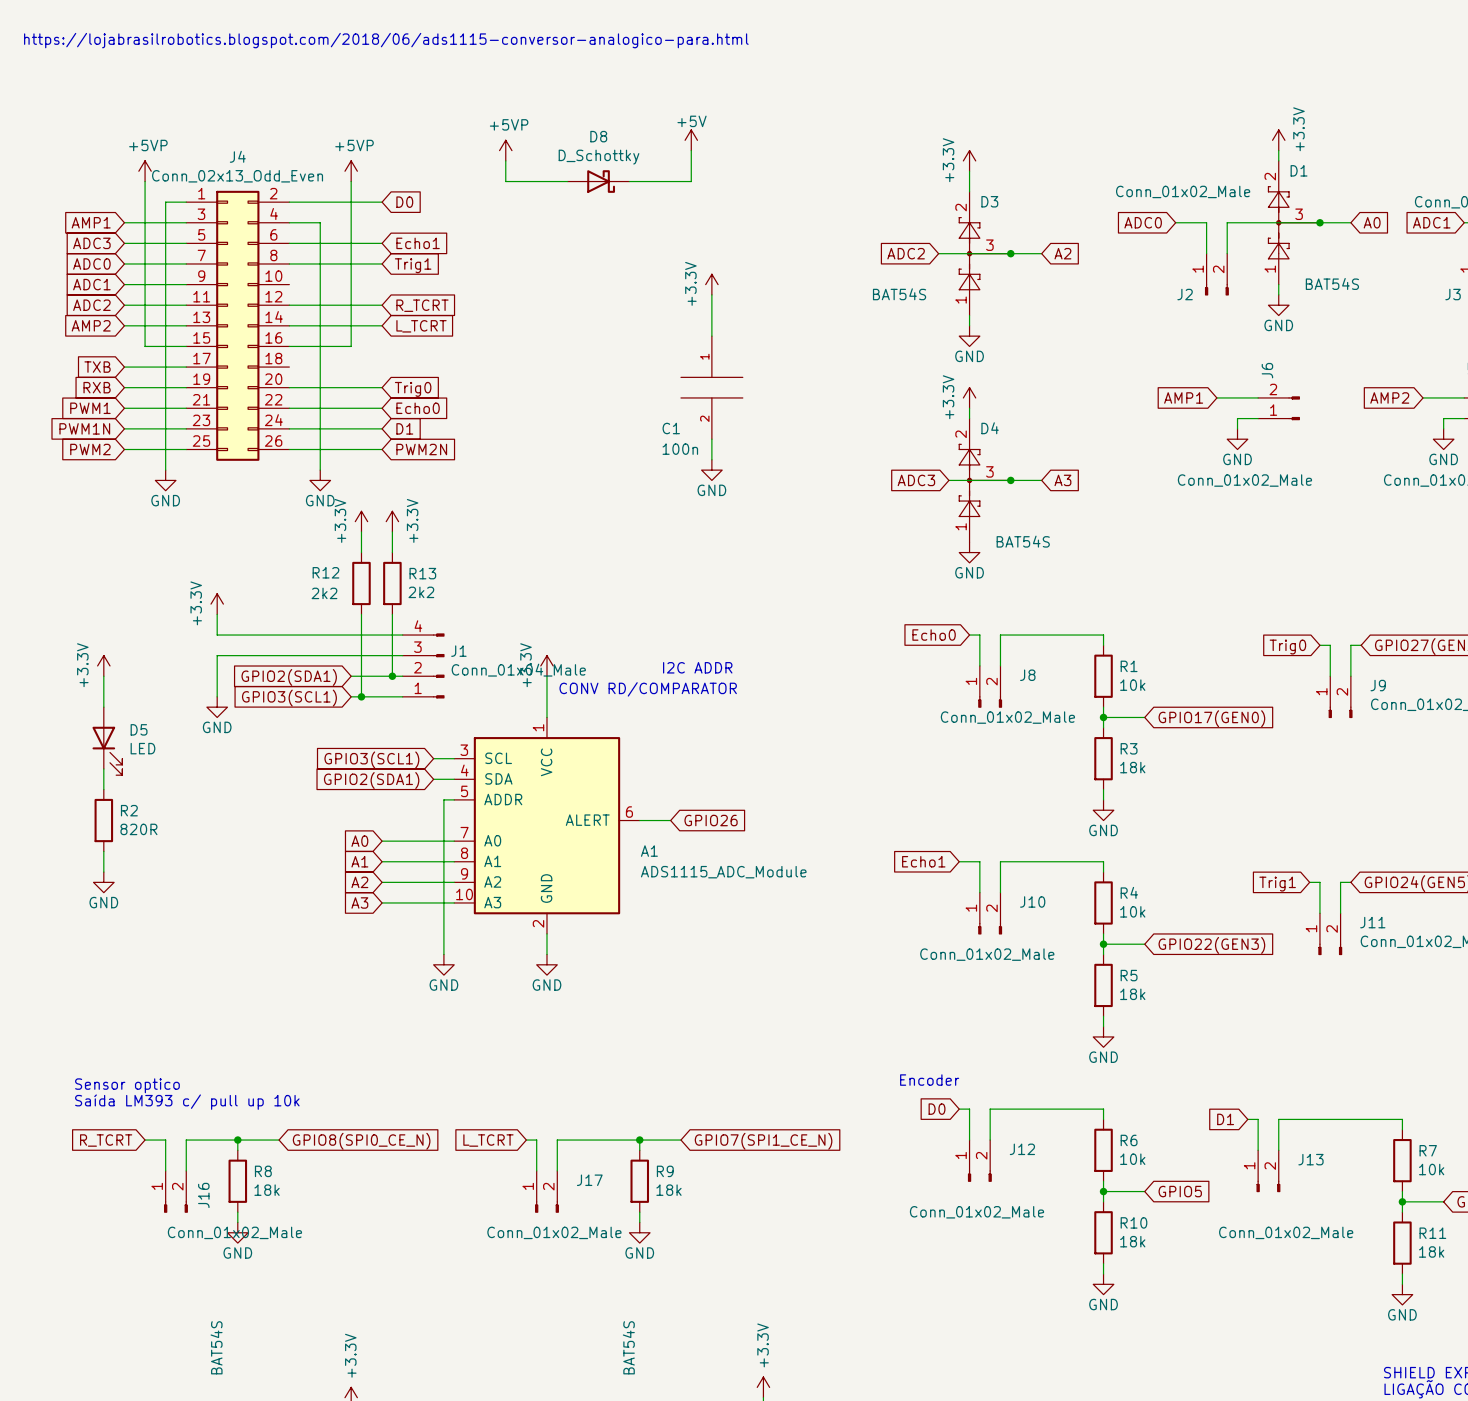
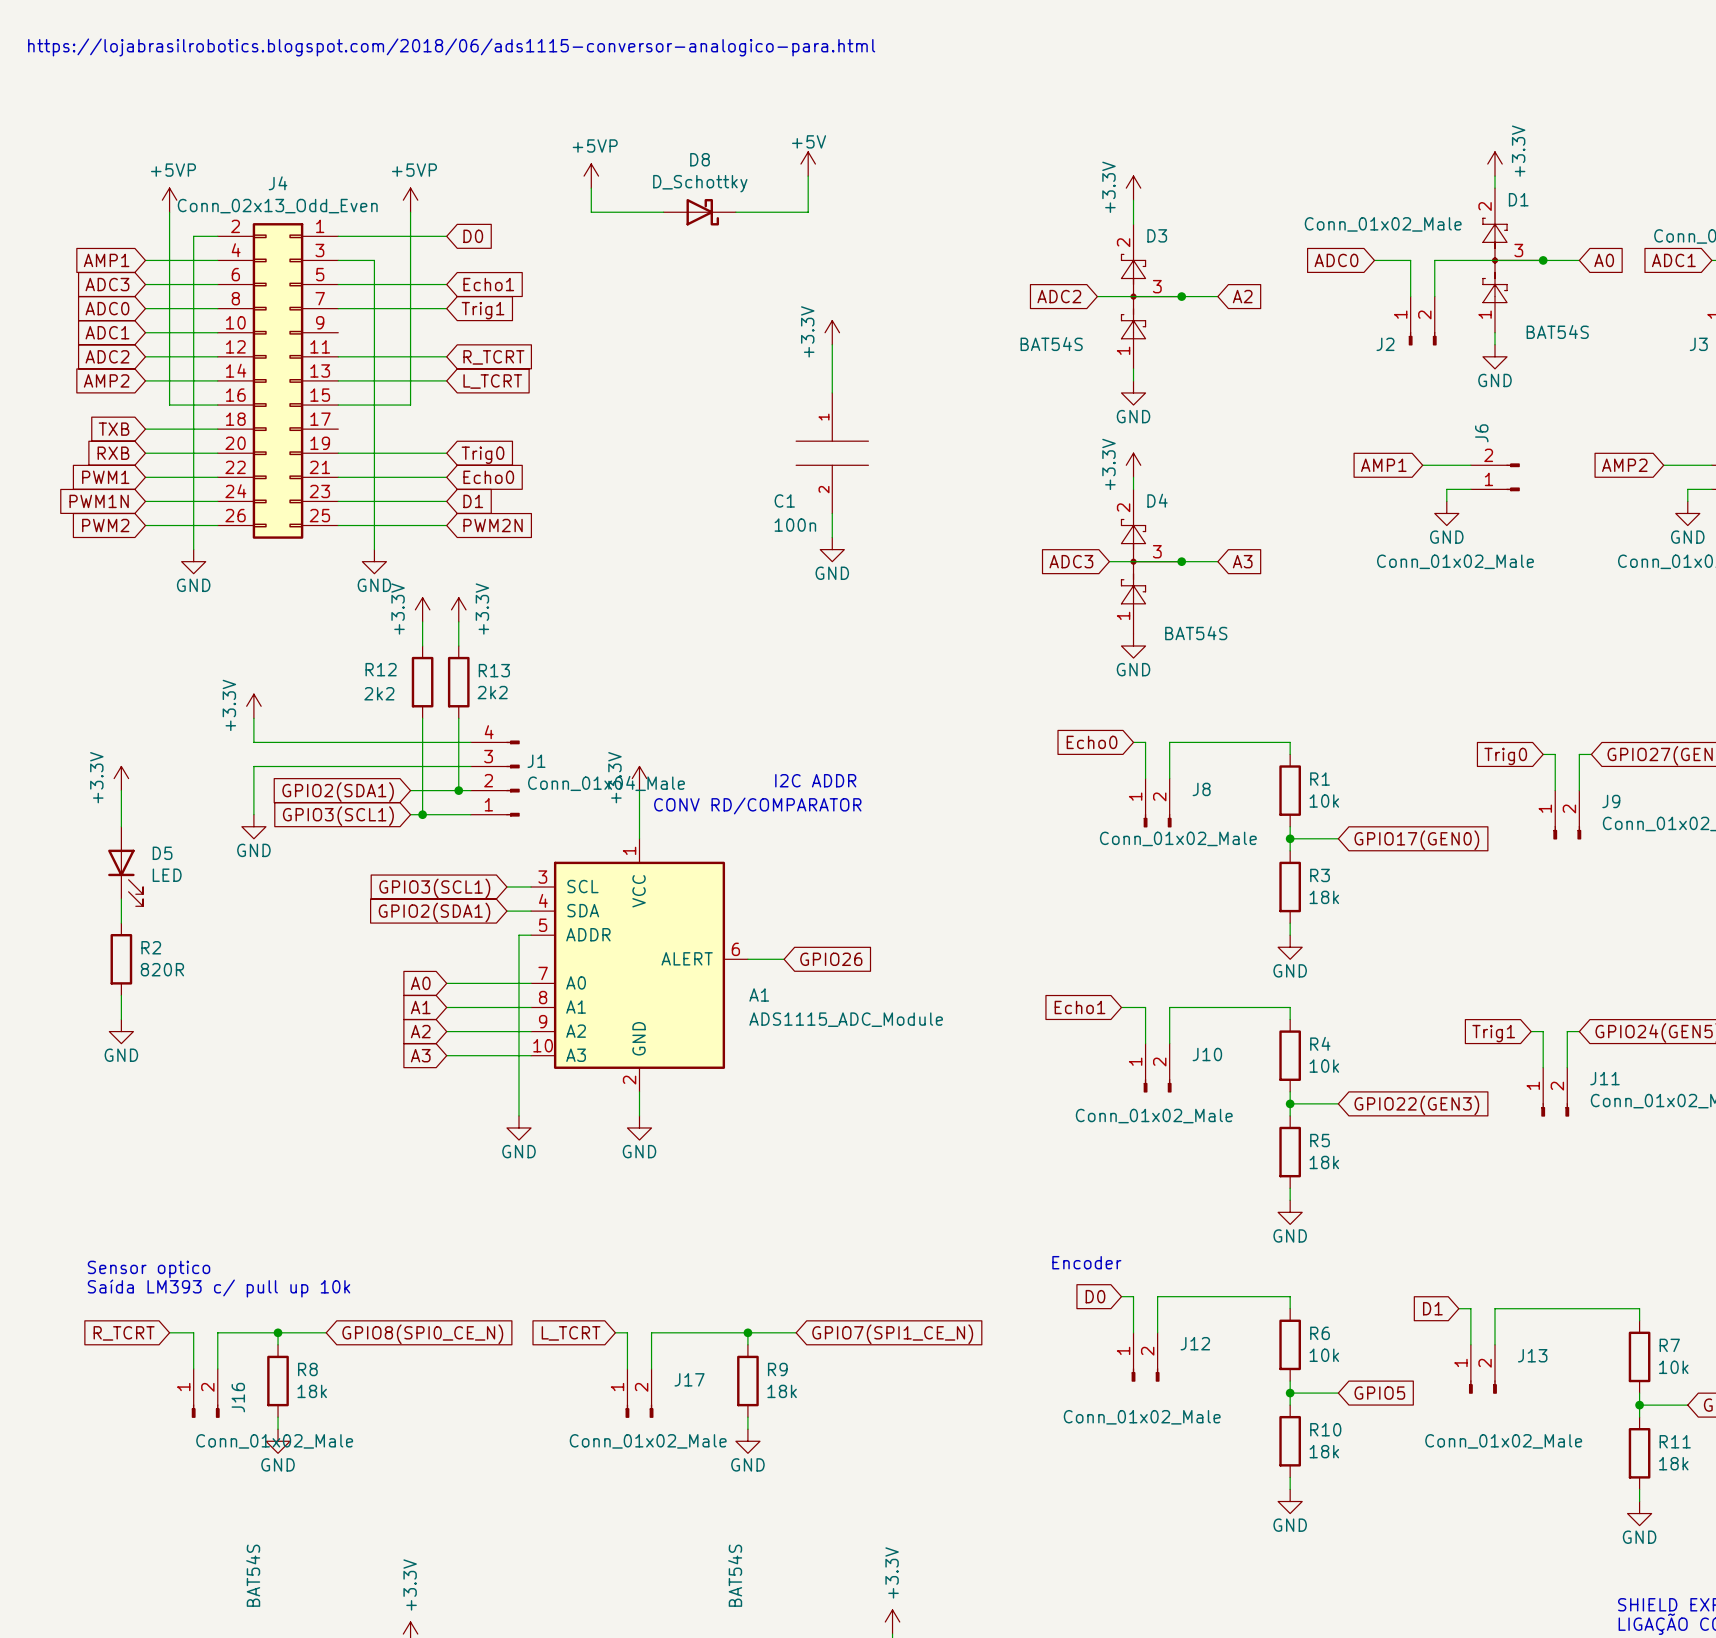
J4 flip: as is (237, 325) -> left-right (278, 380)

